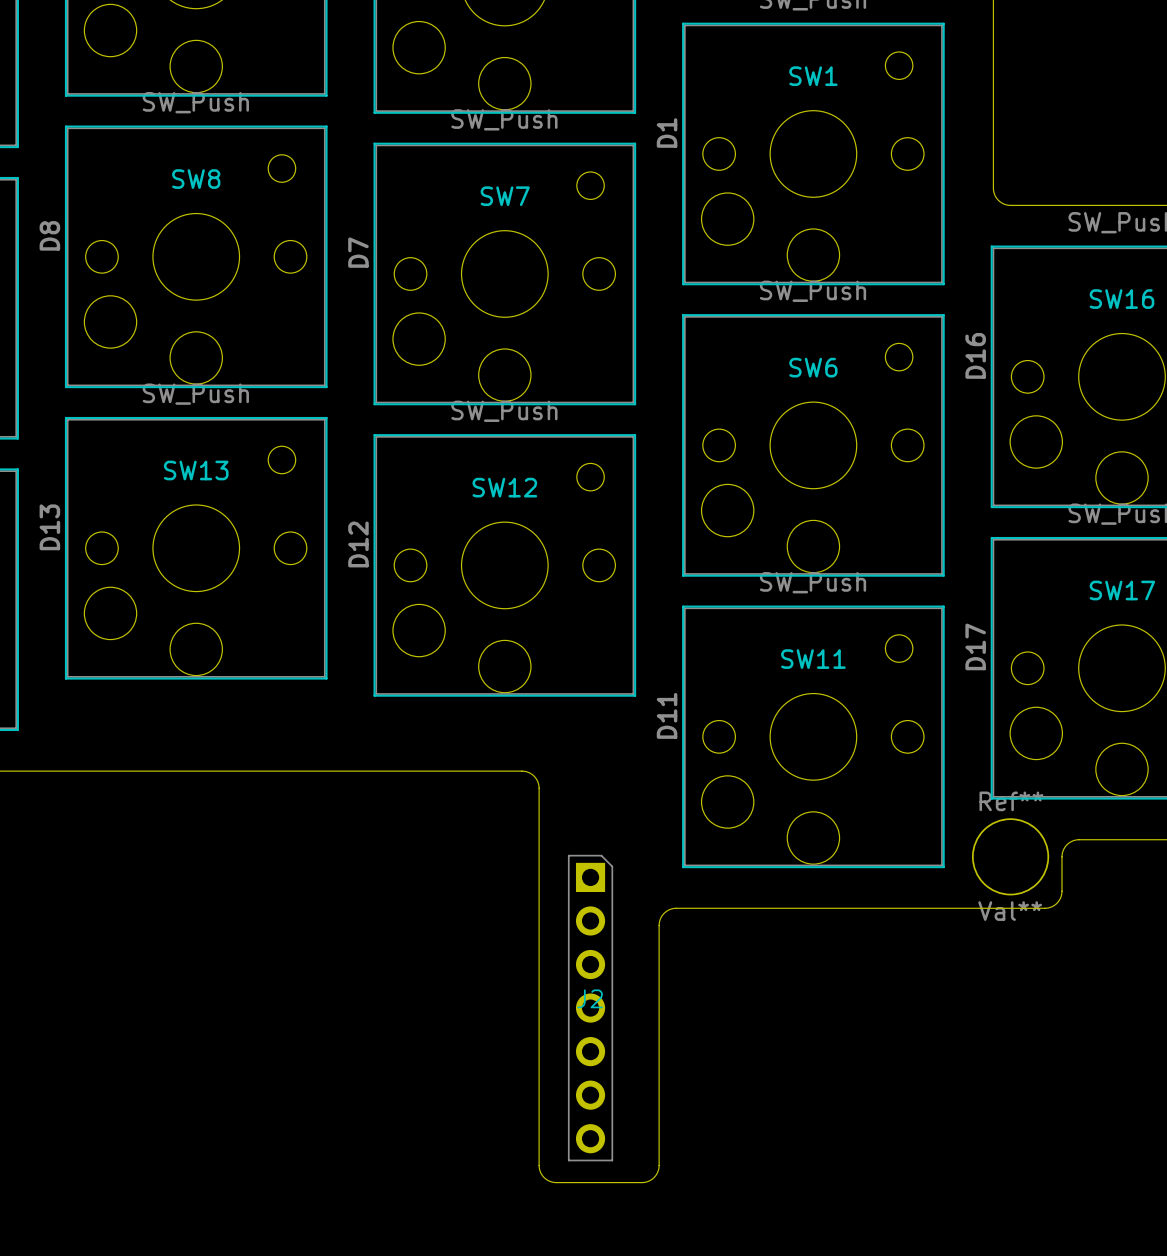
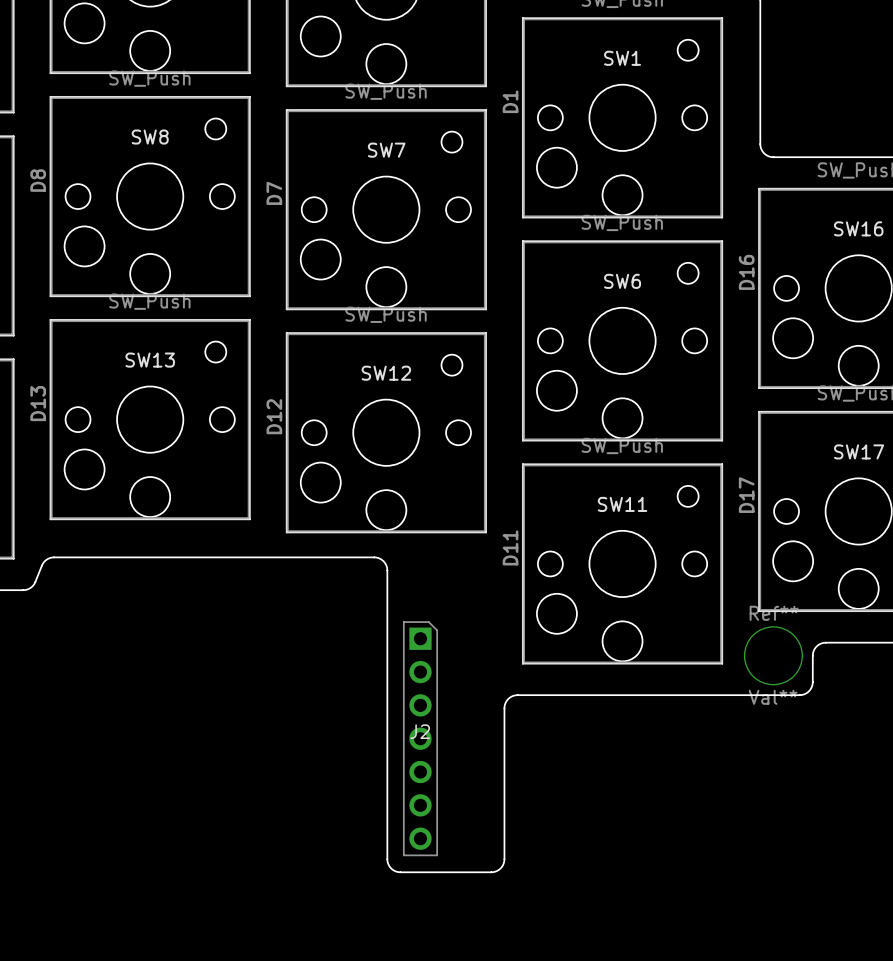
board edge: (30, 771) (521, 771) (531, 773) (536, 779) (539, 788) (539, 1165) (540, 1172) (547, 1179) (554, 1182) (641, 1182) (649, 1180) (656, 1174) (659, 1167) (659, 1122) -> (23, 590) (32, 585) (43, 562) (52, 557) (374, 557) (381, 559) (386, 564) (387, 570) (388, 863) (392, 869) (399, 872) (491, 872) (500, 868) (504, 859)
J2 position: (590, 1008) -> (420, 738)

